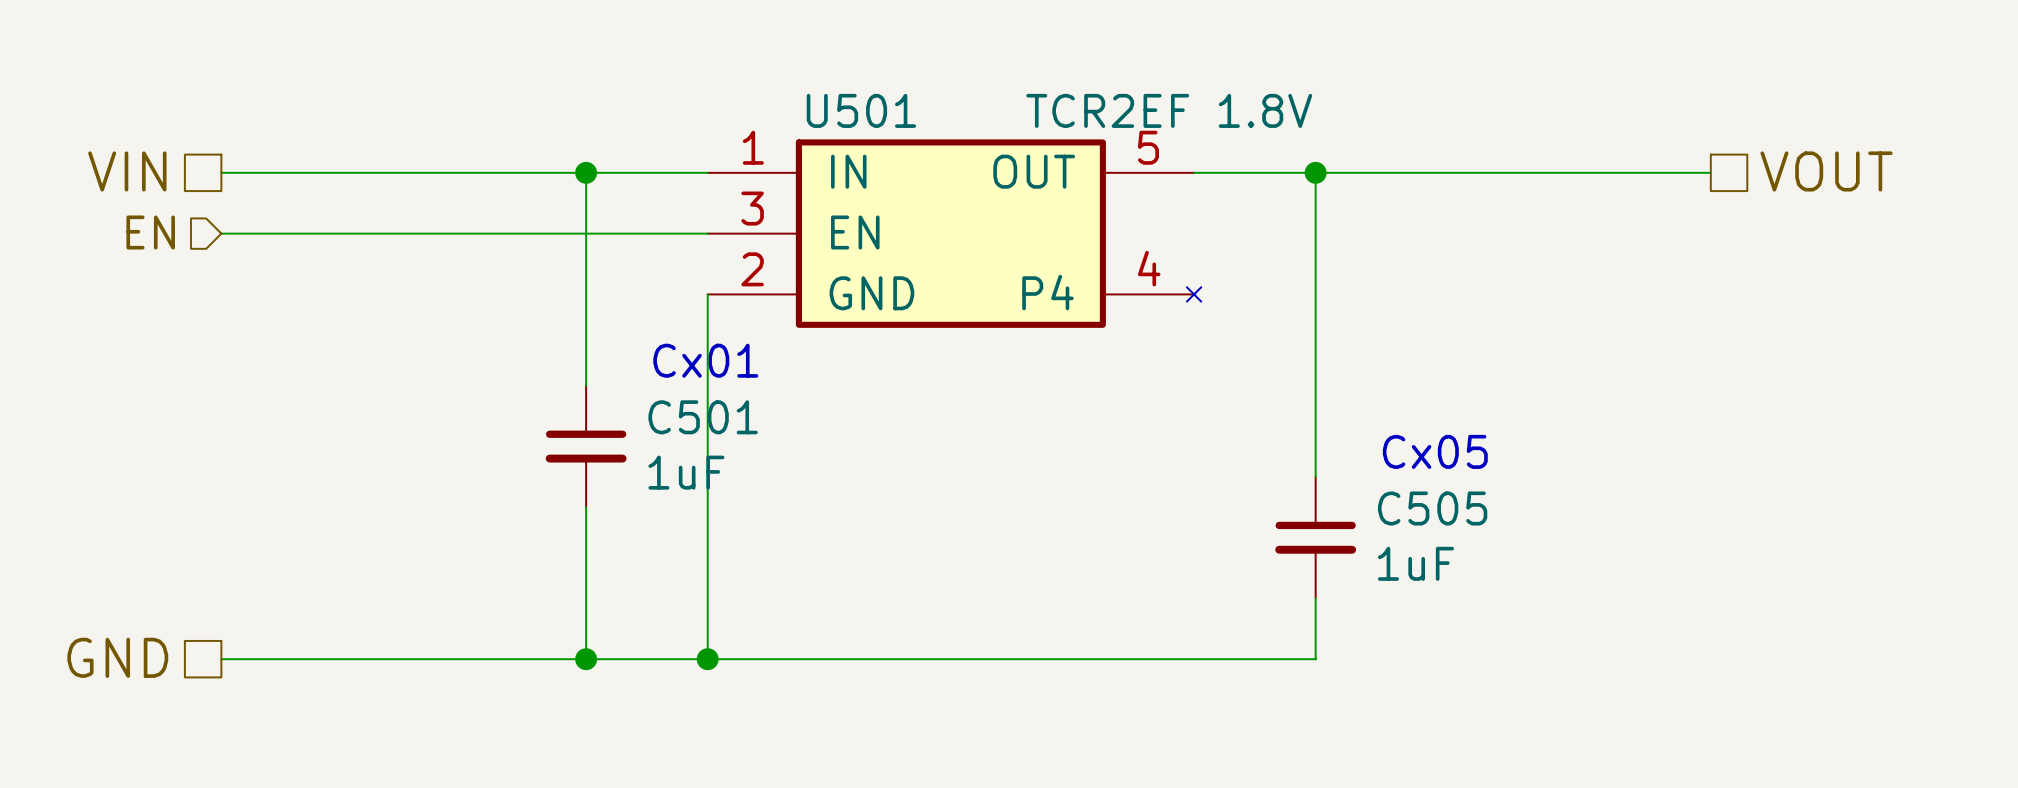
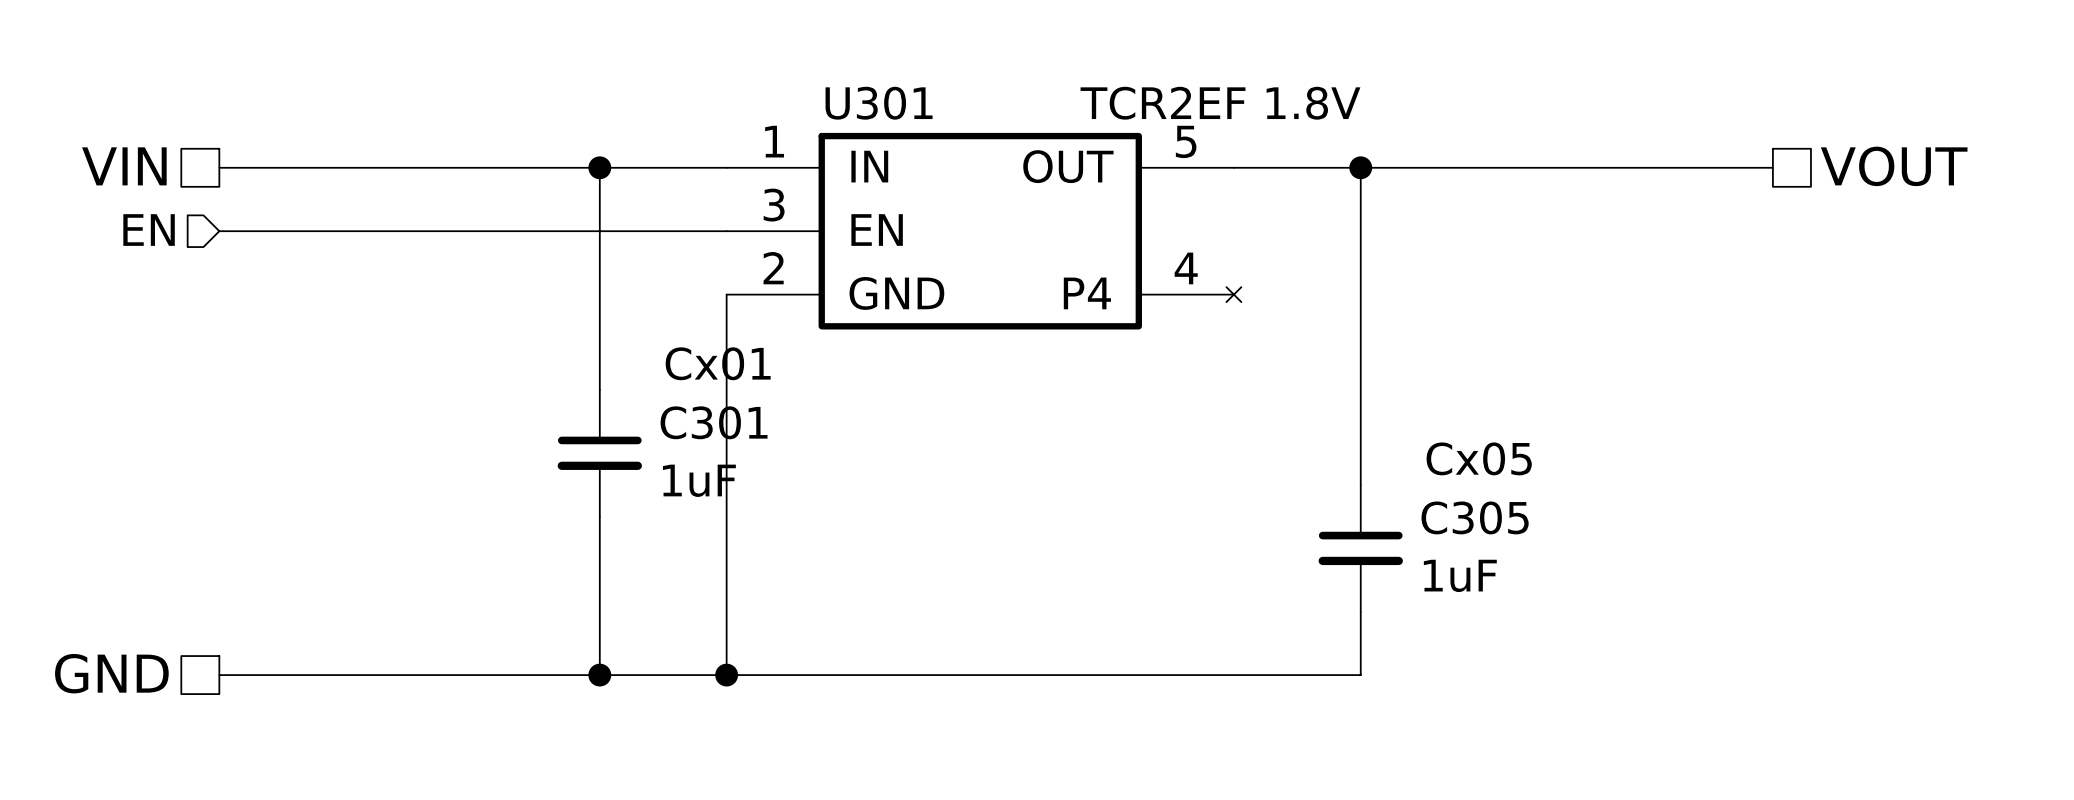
U501 name: U501 (861, 110) -> U301 (879, 103)
C501 name: C501 (703, 417) -> C301 (714, 422)
C505 name: C505 (1432, 508) -> C305 (1475, 517)

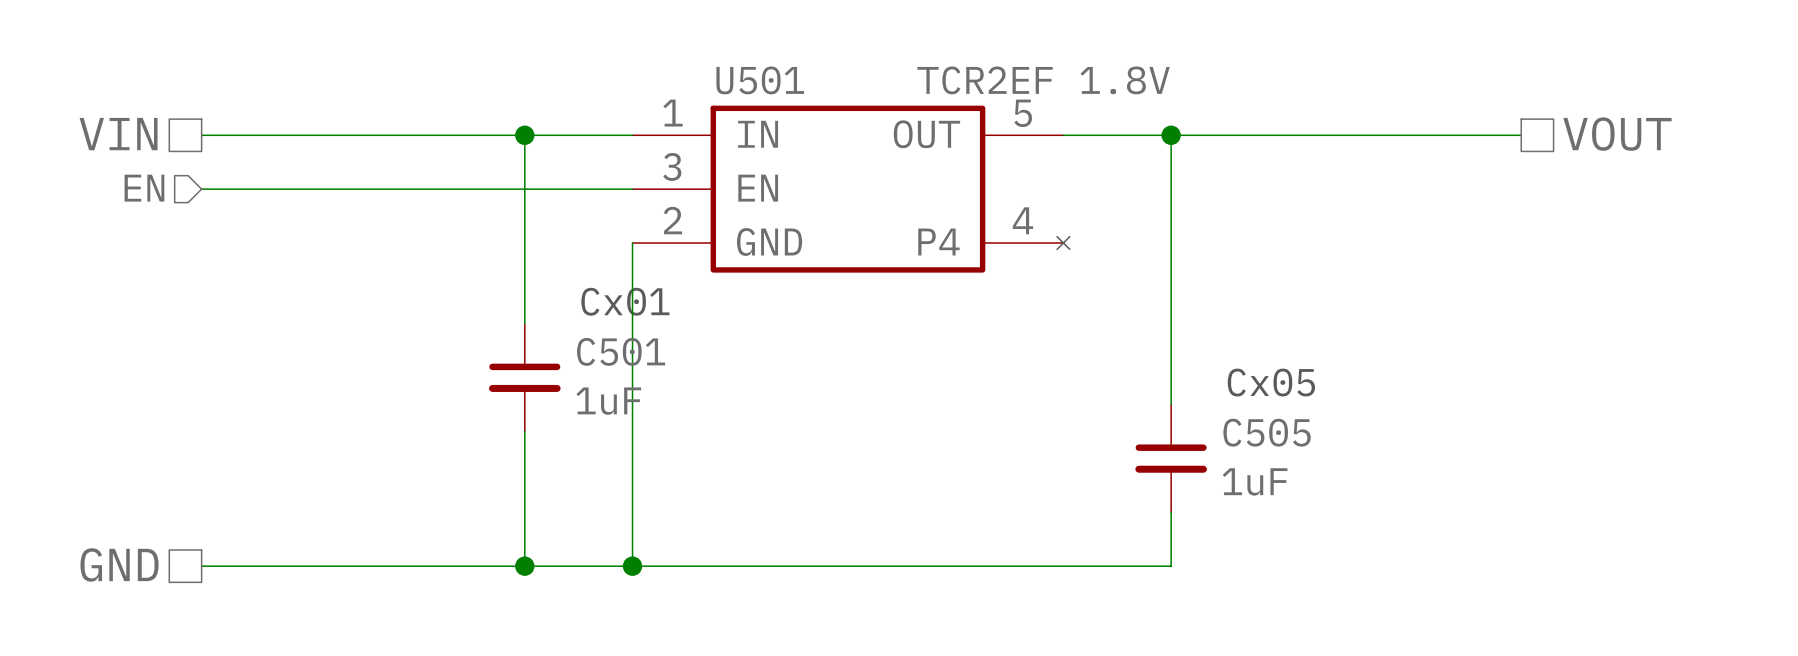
U301 name: U301 (879, 103) -> U501 (760, 80)
C301 name: C301 (714, 422) -> C501 (621, 351)
C305 name: C305 (1475, 517) -> C505 (1267, 432)

